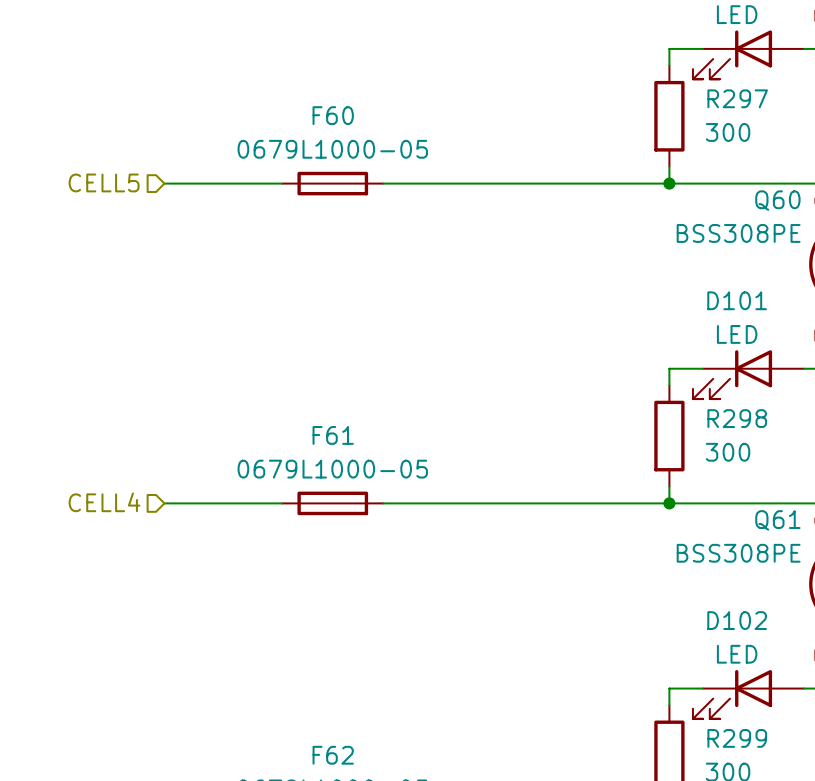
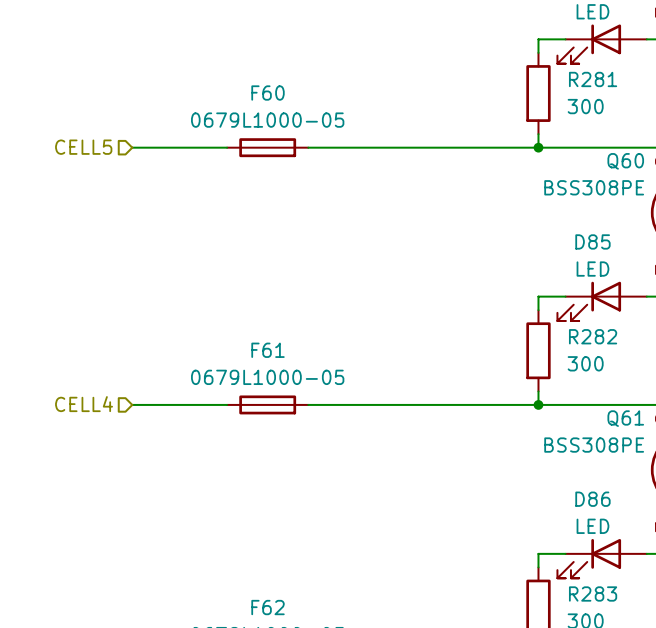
R297 name: R297 (737, 98) -> R281 (593, 79)
D101 name: D101 (737, 300) -> D85 (592, 241)
R298 name: R298 (737, 418) -> R282 (593, 336)
D102 name: D102 (737, 620) -> D86 (592, 499)
R299 name: R299 (737, 738) -> R283 (593, 593)

